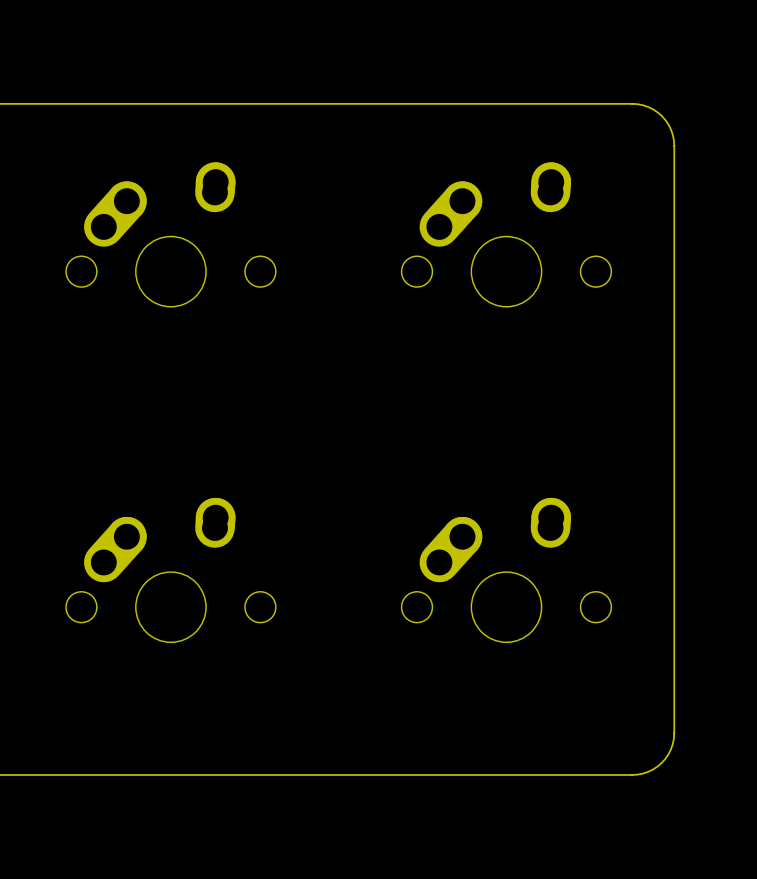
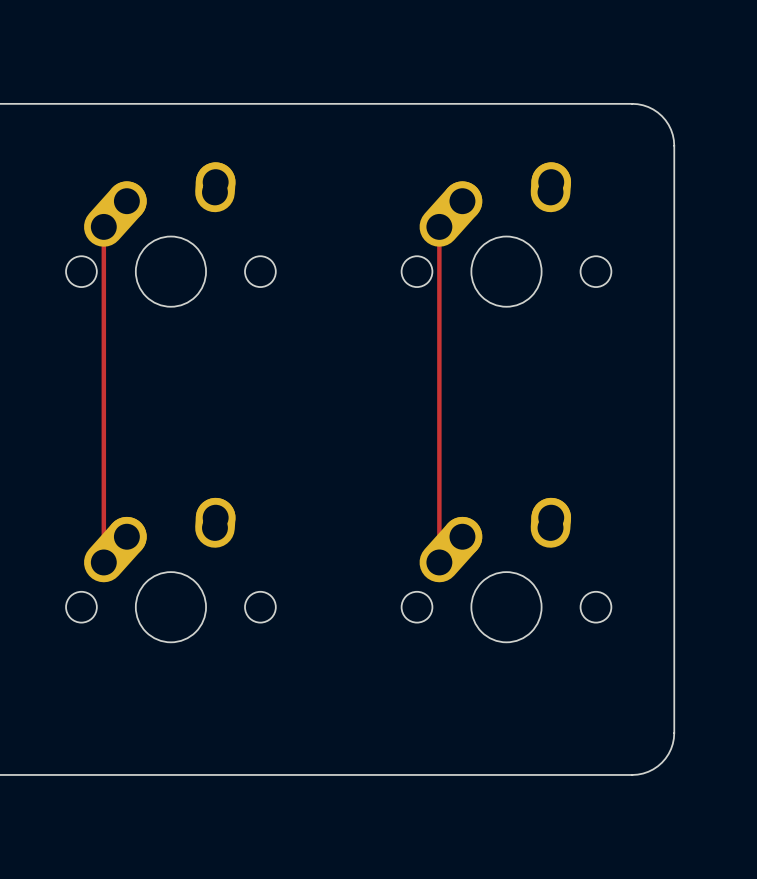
track: none -> (103, 226) (103, 562)
track: none -> (439, 226) (439, 562)

